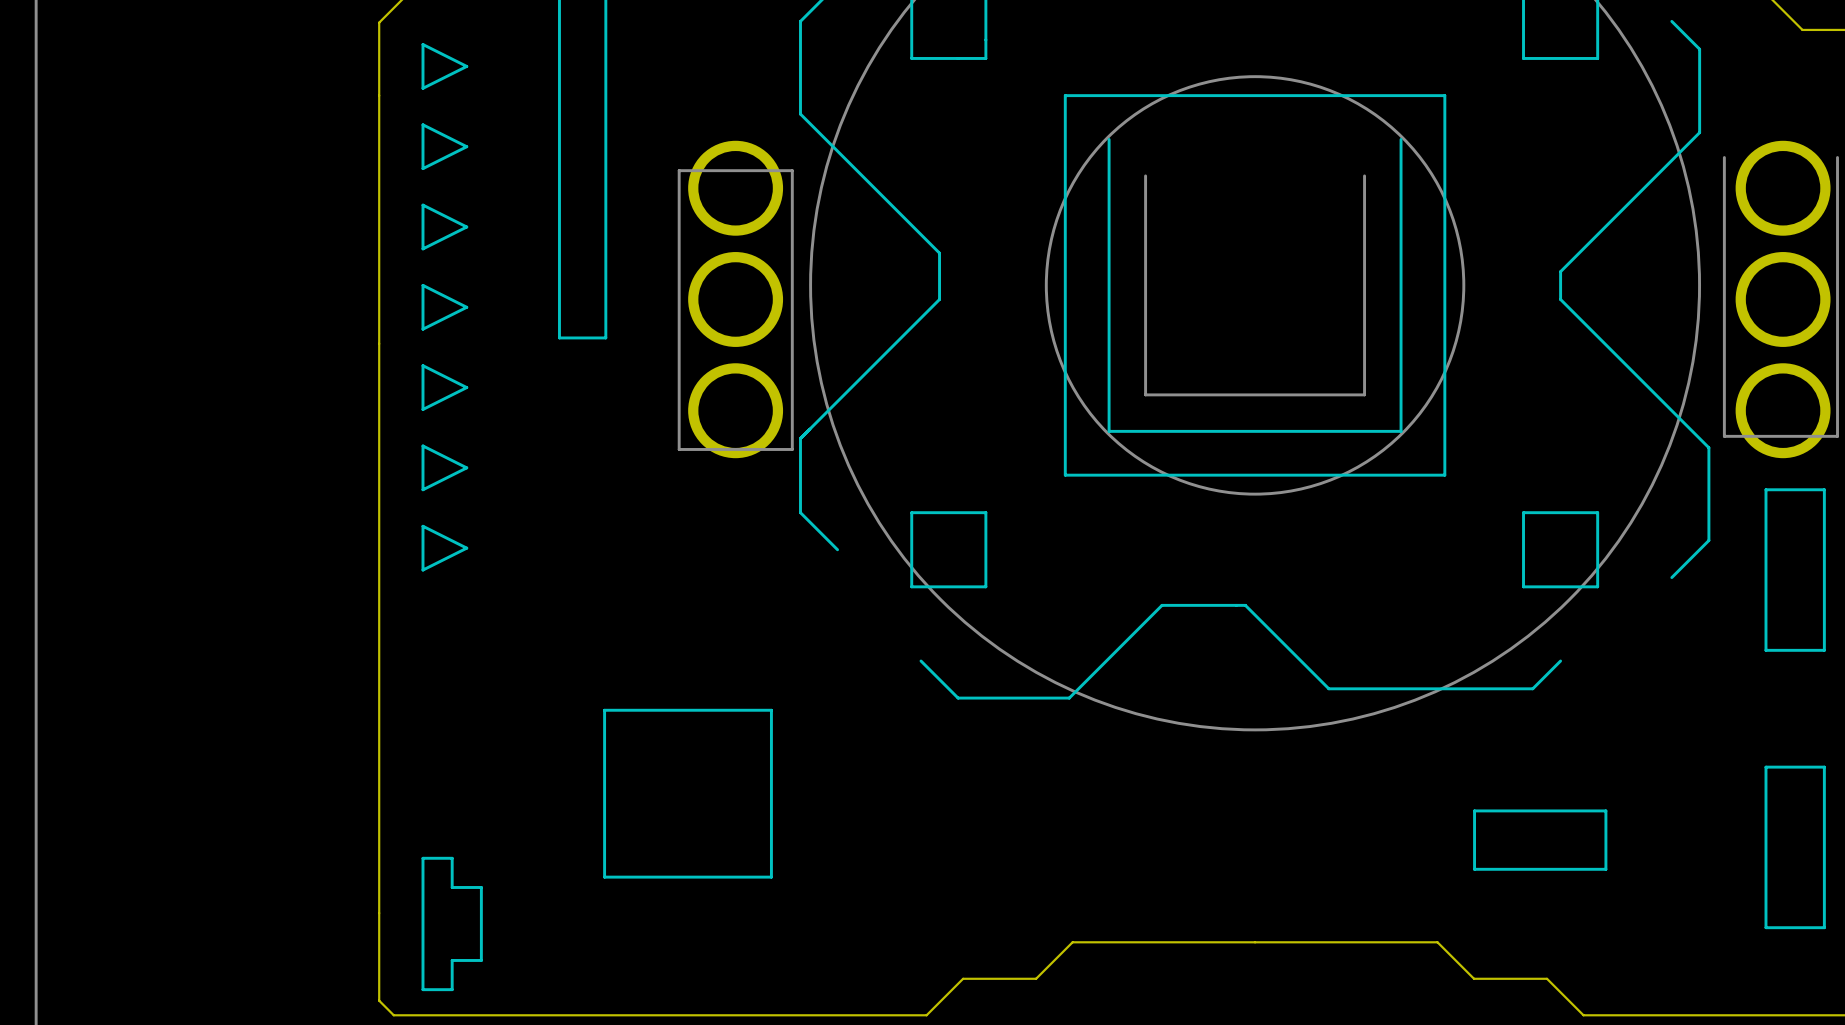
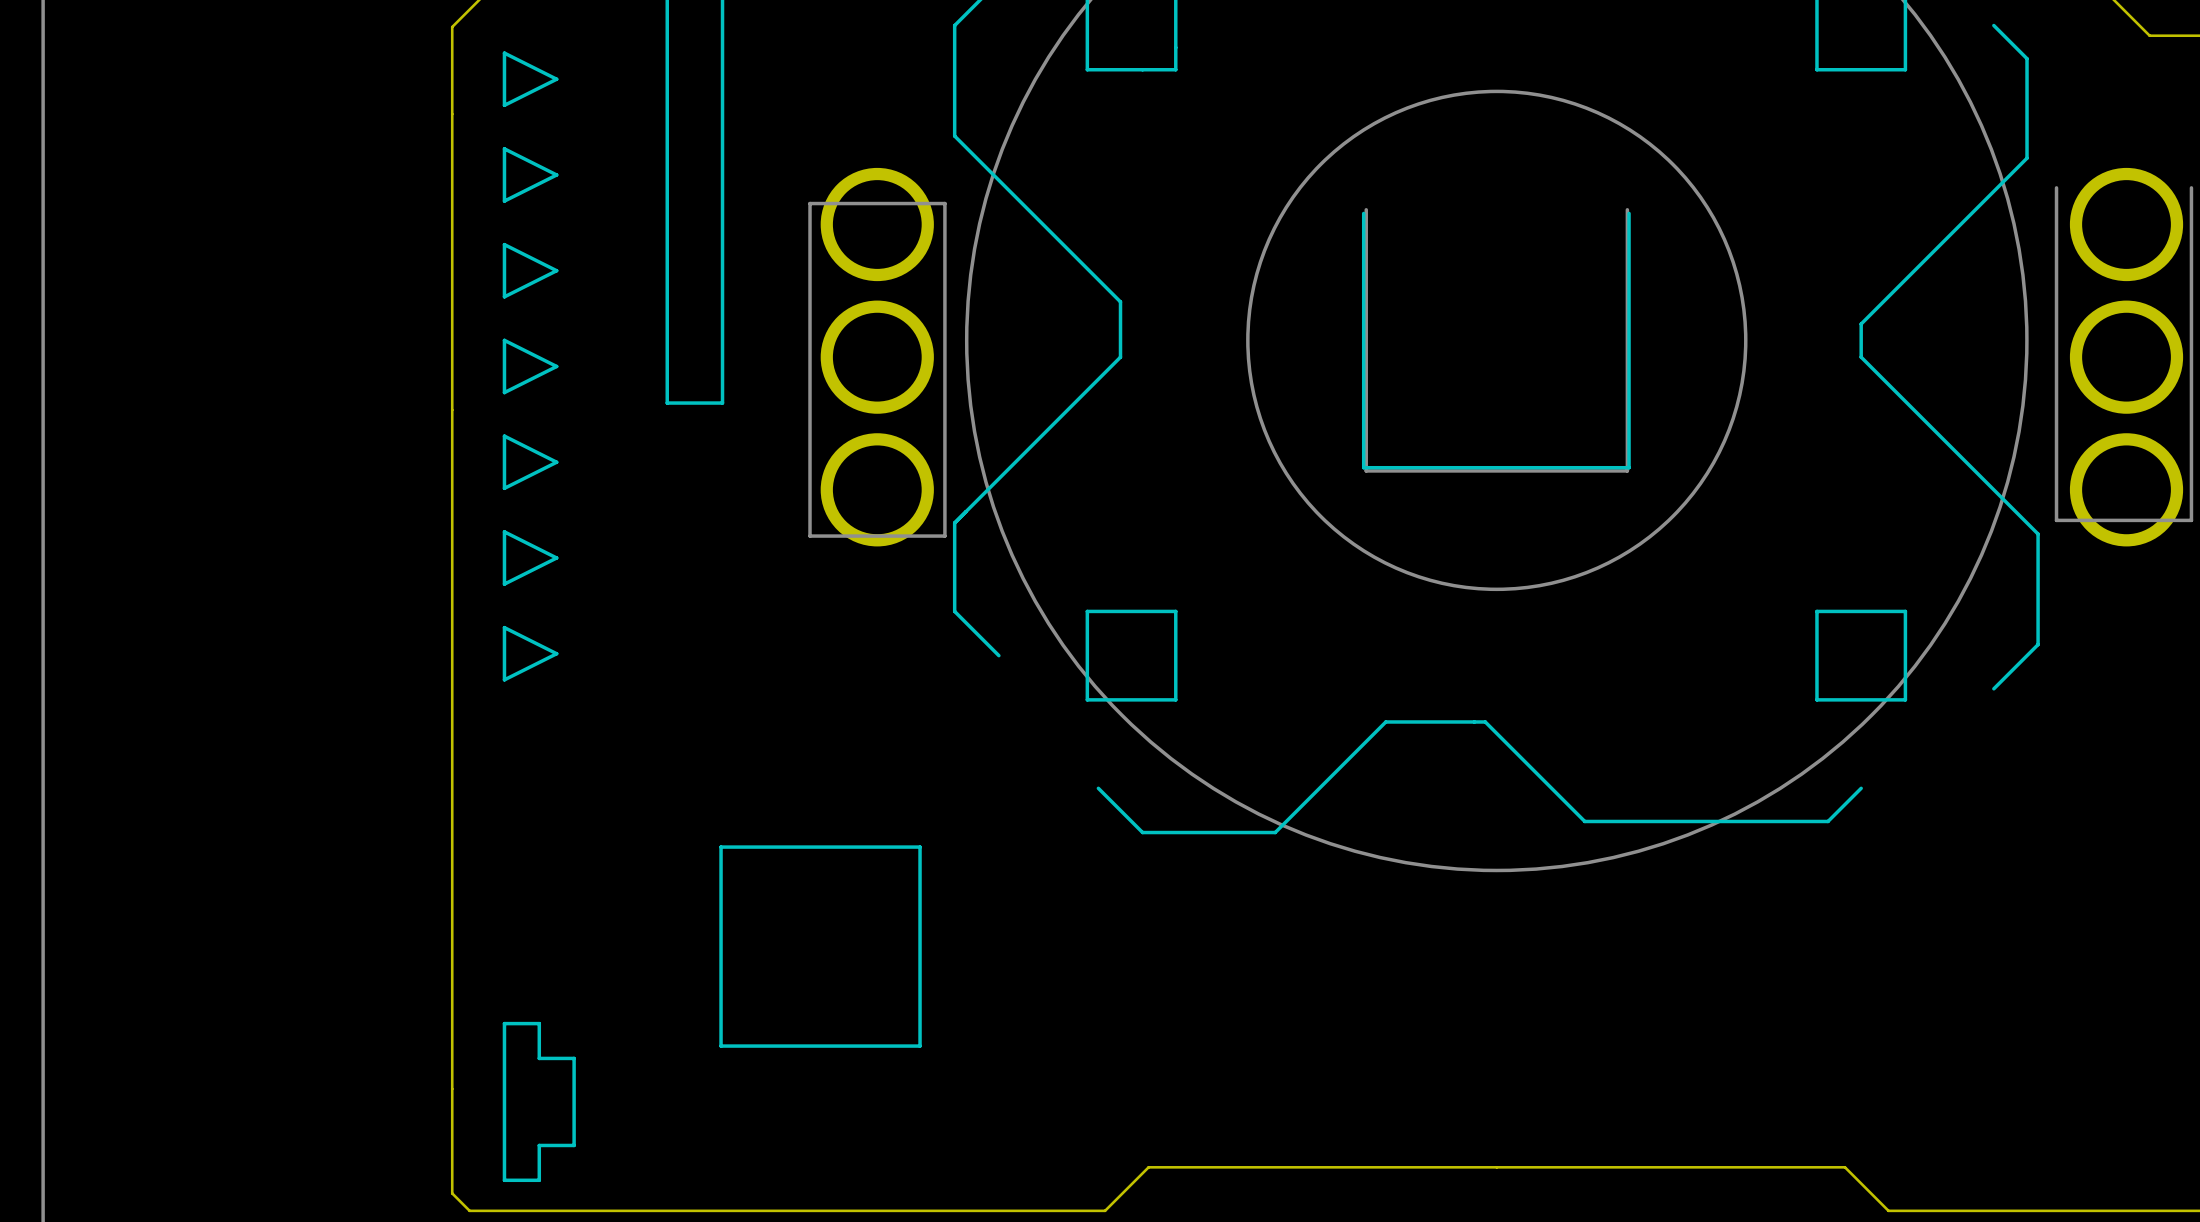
line: (1444, 95) (1065, 95) (1065, 475) (1444, 475) (1444, 95) -> none
line: (1401, 139) (1401, 431) (1109, 431) (1109, 139) -> none
line: none -> (1629, 213) (1629, 467) (1363, 467) (1363, 213)
line: (1824, 489) (1824, 650) (1765, 650) (1765, 489) (1824, 489) -> none
line: (1824, 767) (1765, 767) (1765, 927) (1824, 927) (1824, 767) -> none
line: (1605, 810) (1605, 869) (1474, 869) (1474, 810) (1605, 810) -> none
board edge: (1474, 978) (1437, 942) (1072, 942) (1036, 978) -> (1757, 1167) (1235, 1167)

